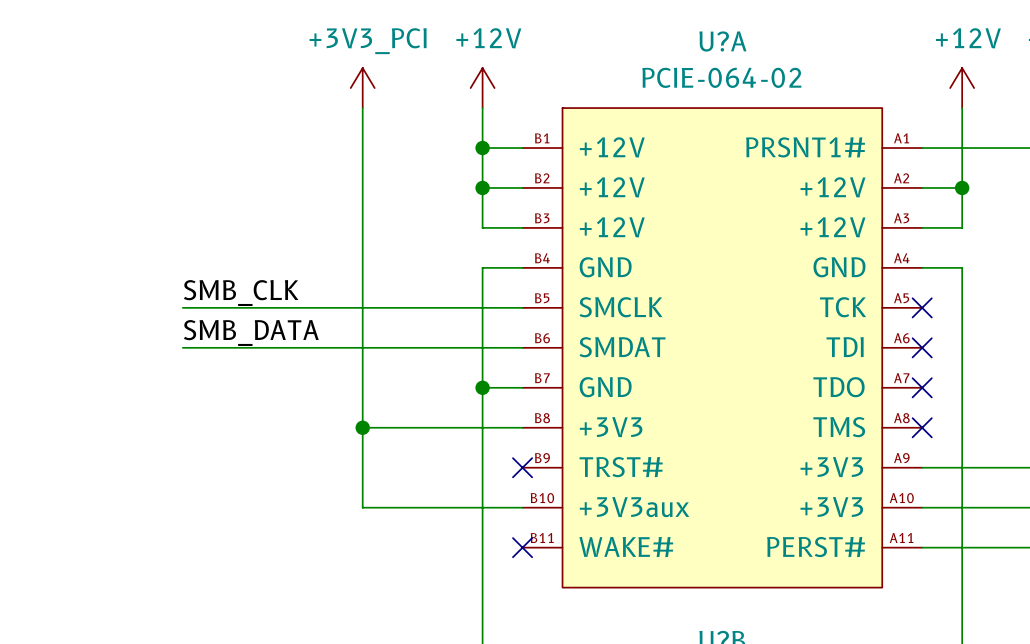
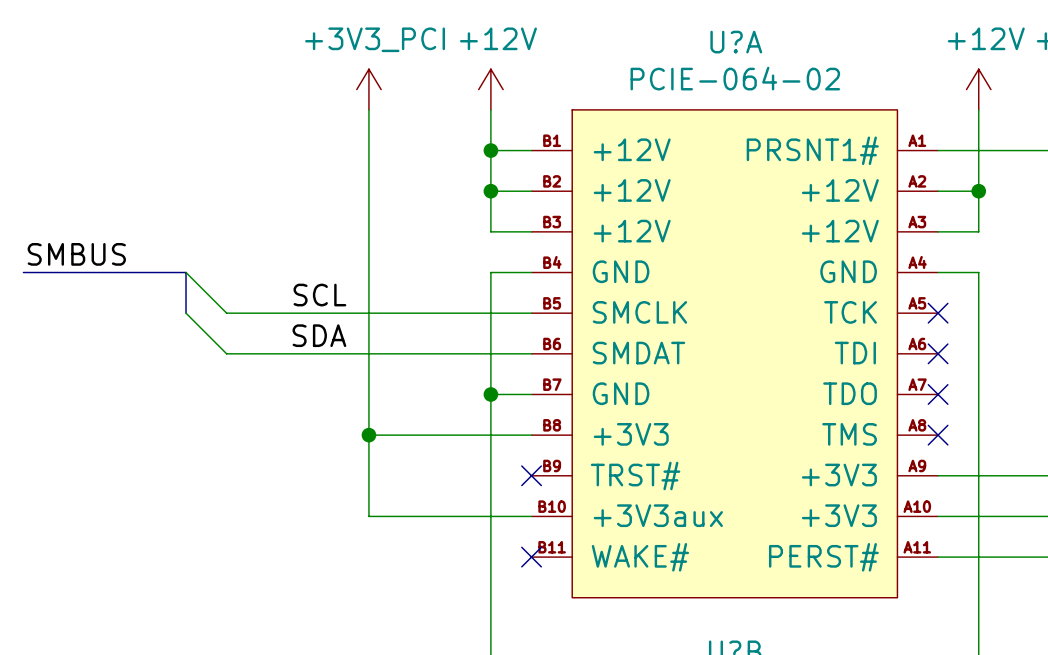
label: none -> SMBUS (76, 254)
bus: none -> (23, 272) (186, 272) (186, 313)
label: none -> SCL (319, 295)
label: SMB_CLK (241, 293) -> none
wire: (182, 307) (222, 307) -> (186, 272) (226, 313)
label: none -> SDA (319, 335)
label: SMB_DATA (251, 332) -> none
wire: (182, 347) (222, 347) -> (186, 313) (226, 353)

